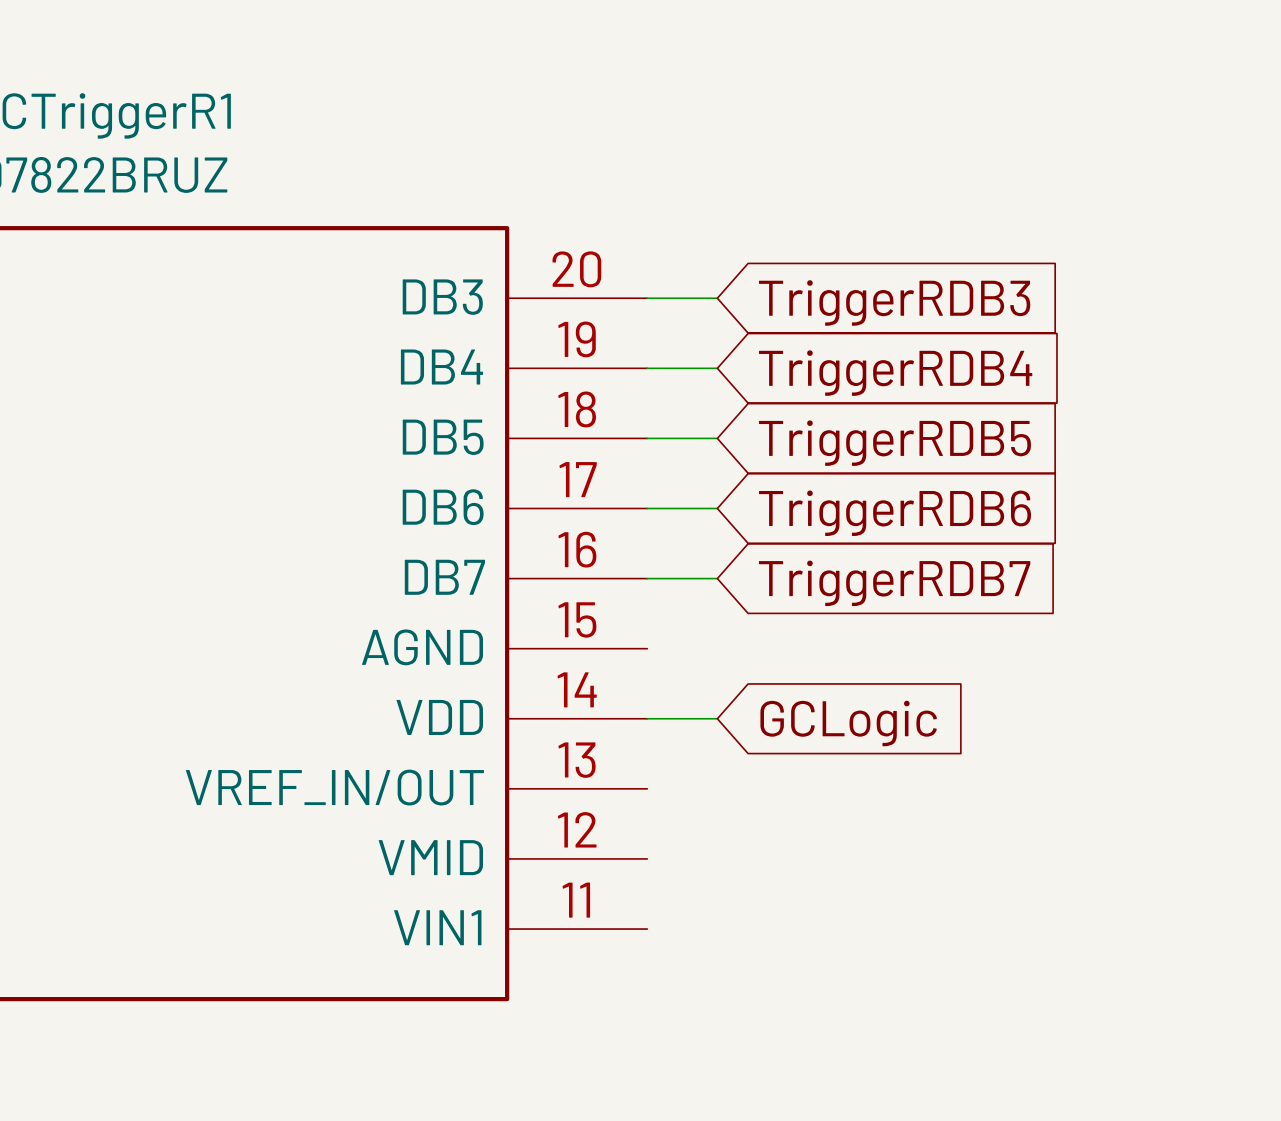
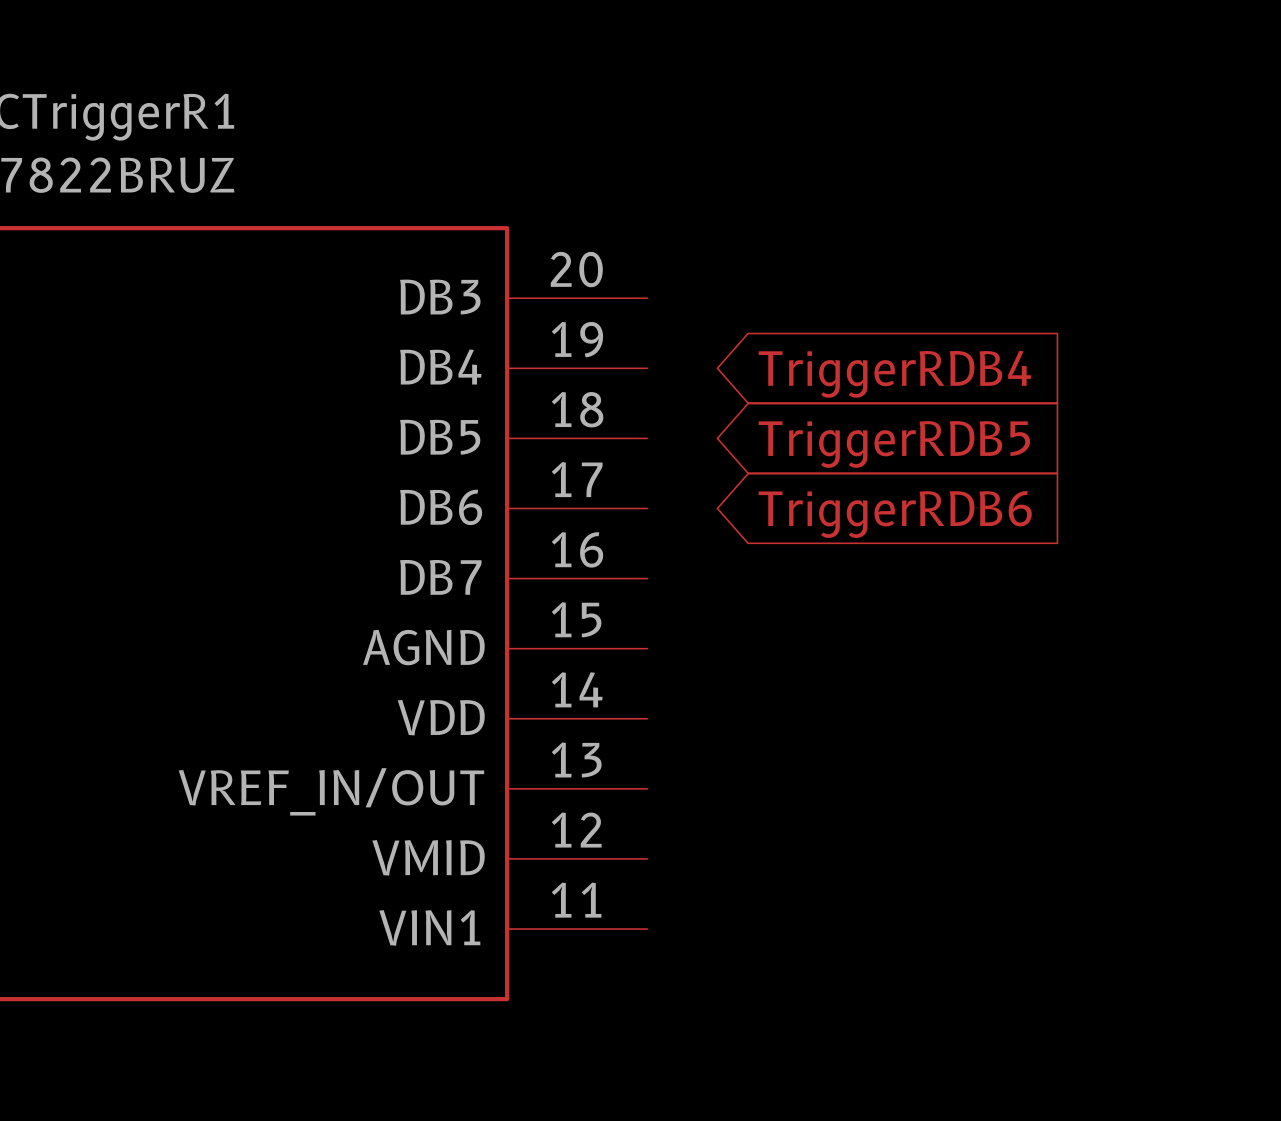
wire: (647, 298) (717, 298) -> none
global label: TriggerRDB3 (894, 302) -> none
wire: (647, 368) (717, 368) -> none
wire: (647, 438) (717, 438) -> none
wire: (647, 508) (717, 508) -> none
wire: (647, 578) (717, 578) -> none
global label: TriggerRDB7 (894, 583) -> none
wire: (647, 718) (717, 718) -> none
global label: GCLogic (848, 723) -> none

